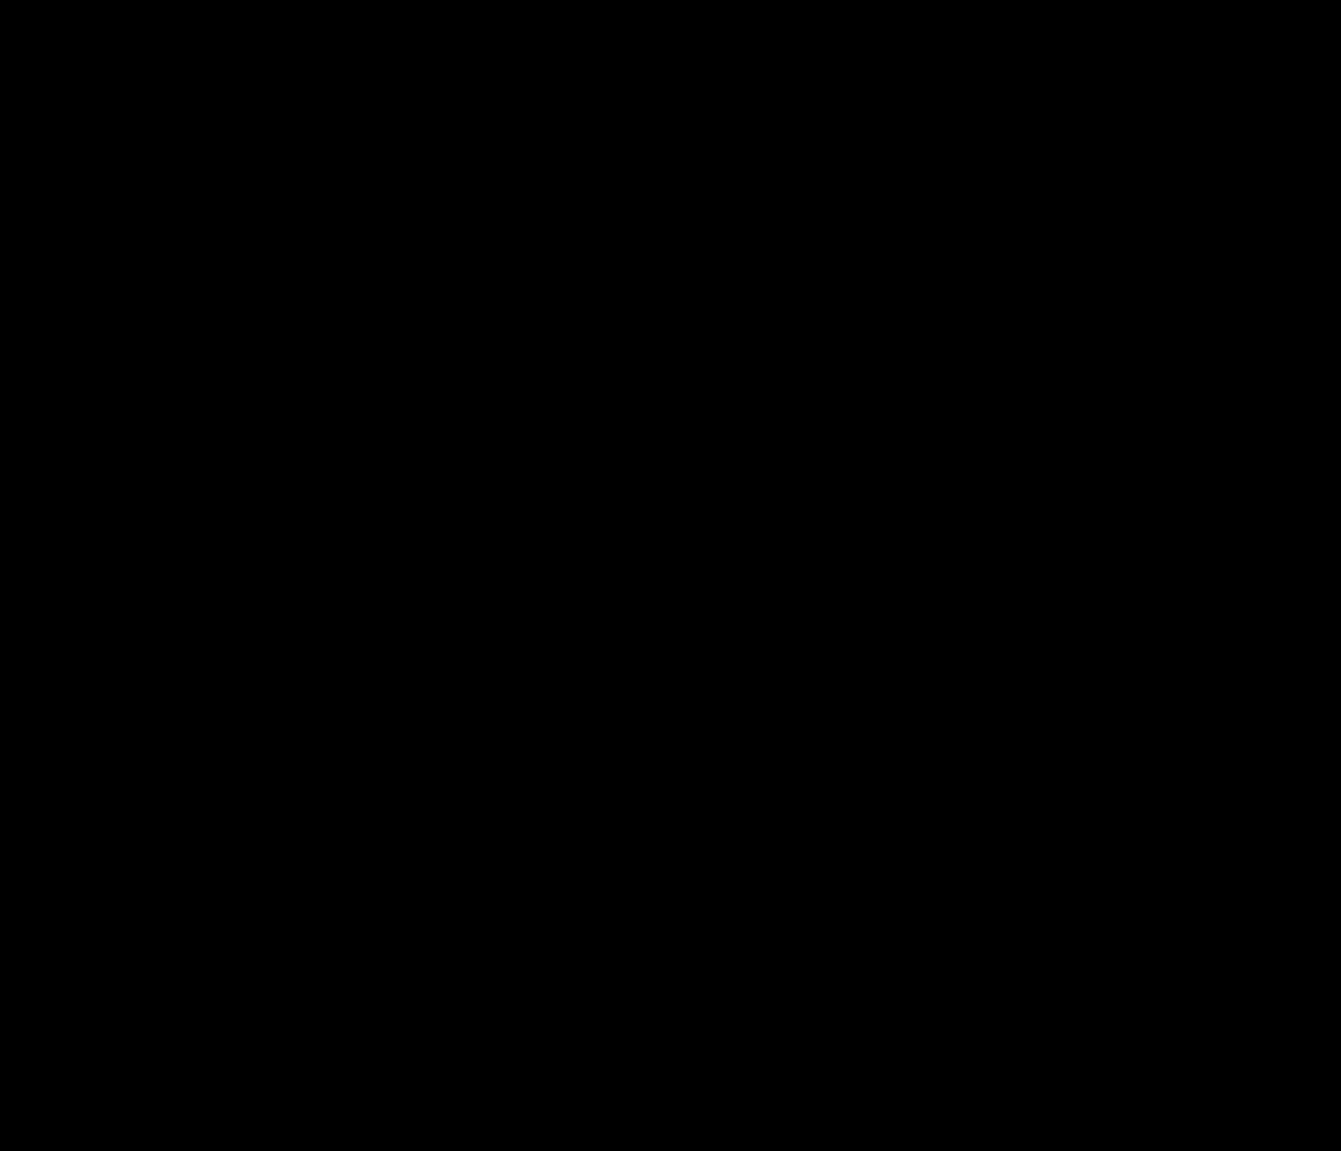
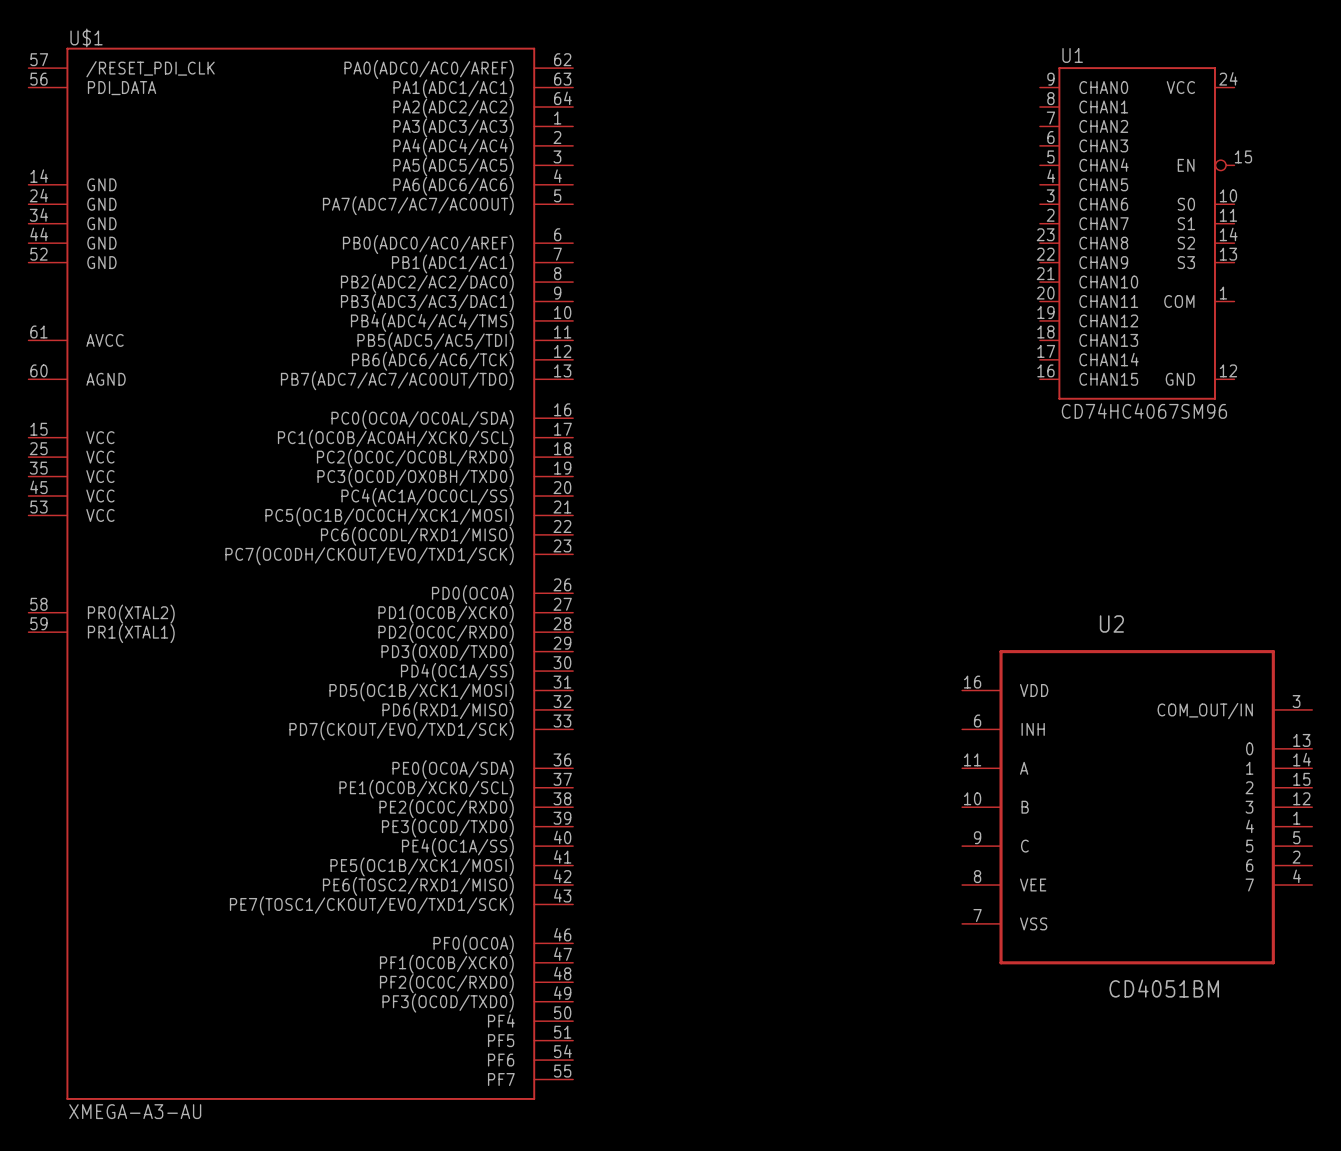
U1: none -> CD74HC4067SM96 (1137, 233)
U$1: none -> XMEGA-A3-AU (300, 573)
U2: none -> CD4051BM (1137, 807)

